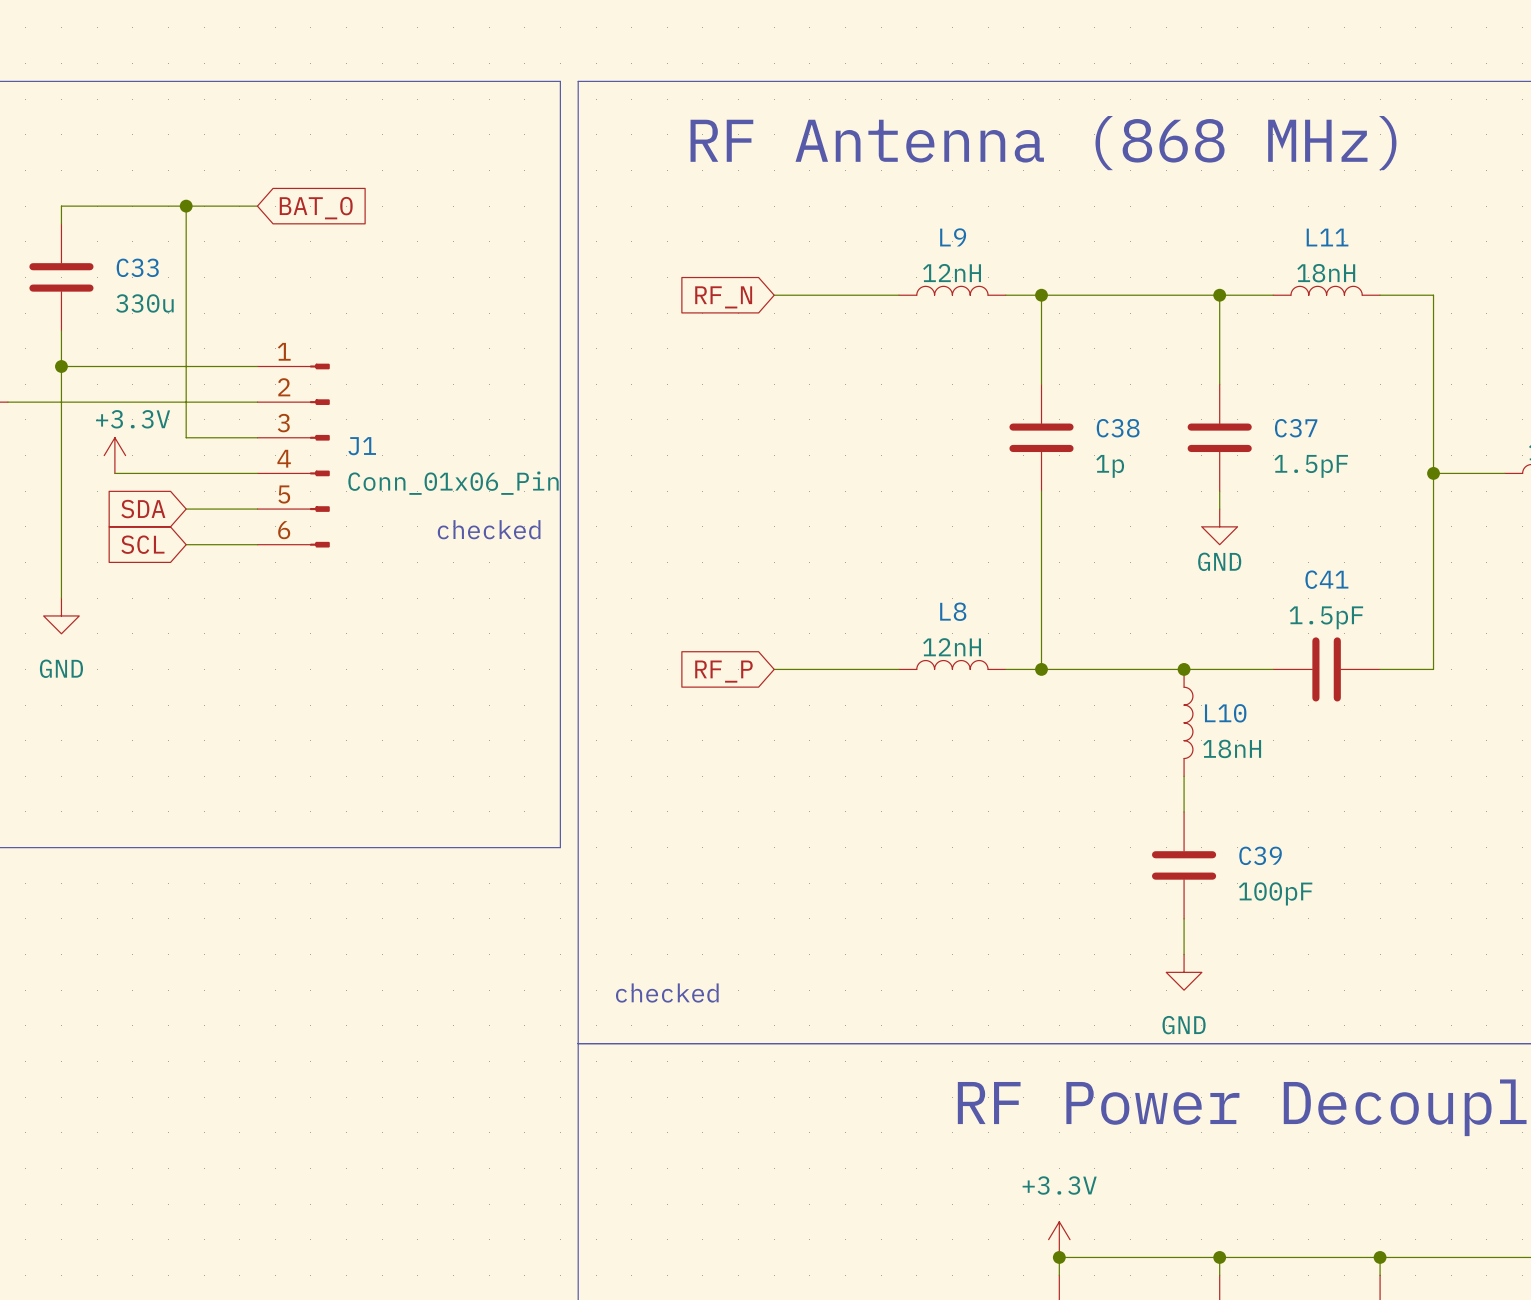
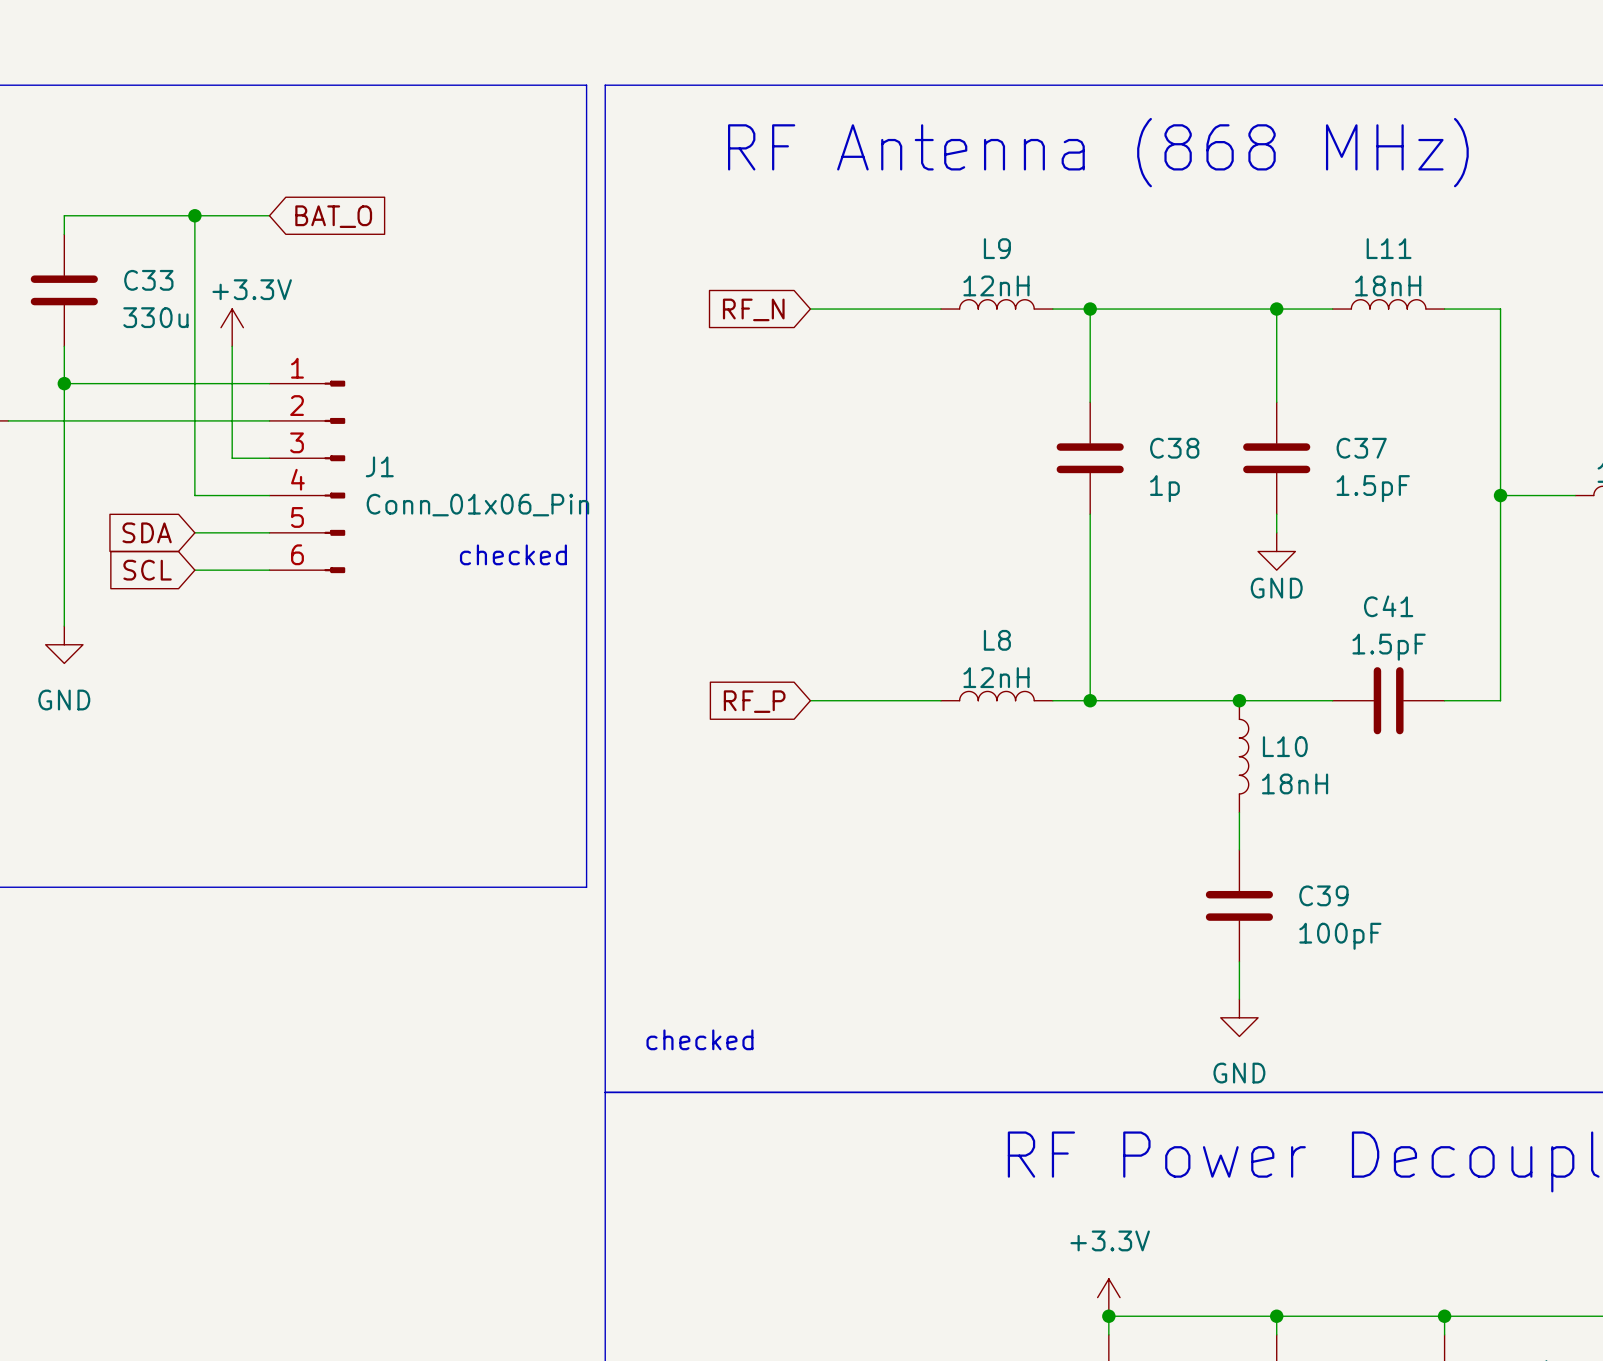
wire: none -> (232, 346) (232, 458)
wire: (186, 437) (221, 437) -> (194, 458) (194, 495)
power symbol position: +3.3V (114, 455) -> +3.3V (232, 327)
wire: (114, 473) (186, 473) -> none

